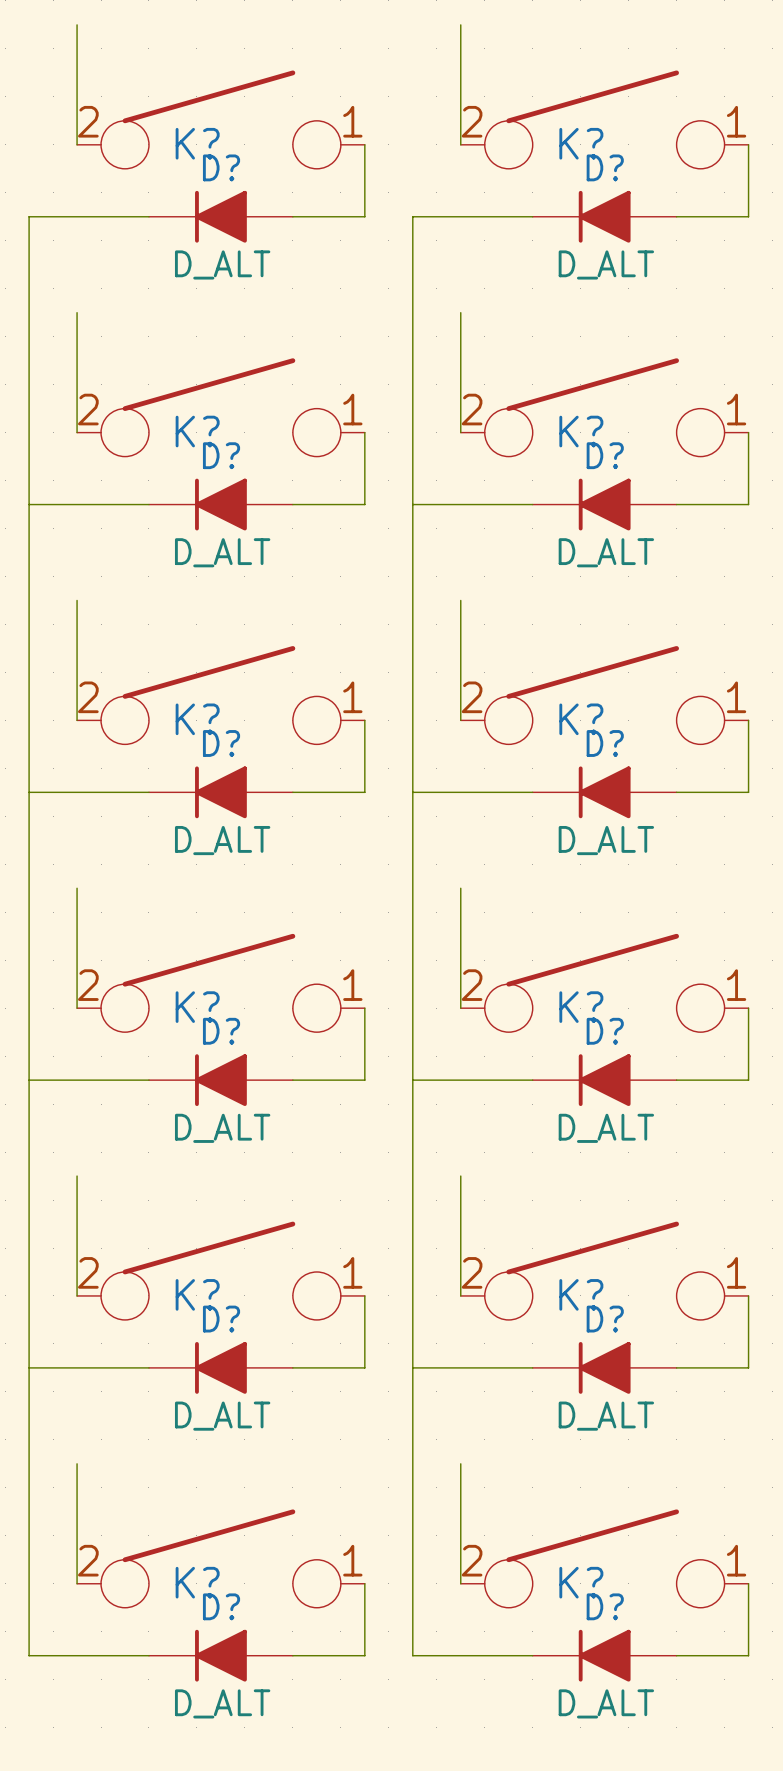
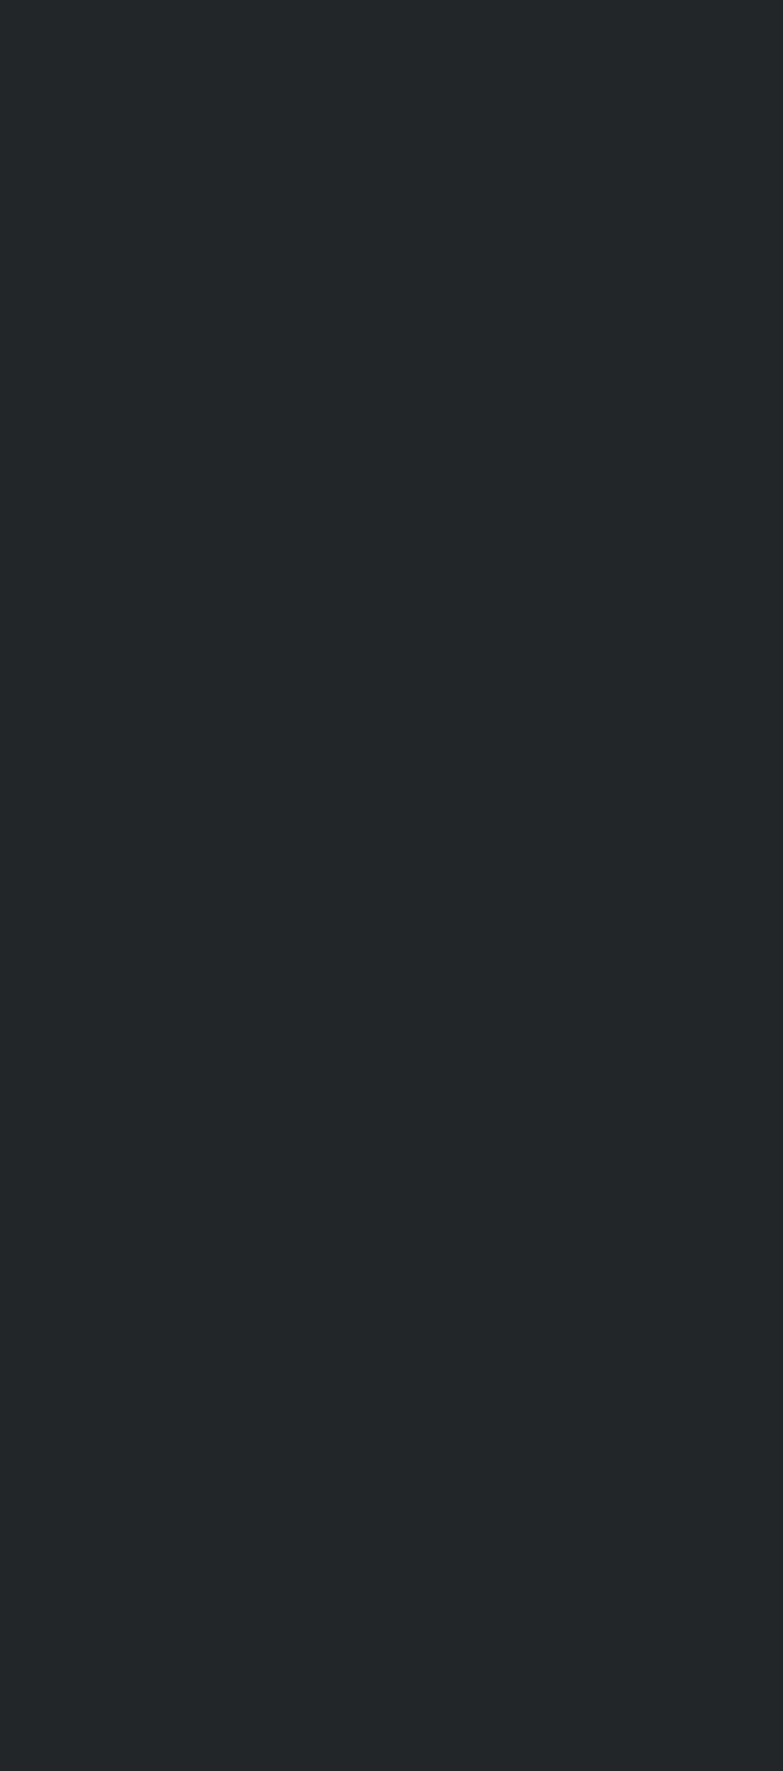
wire: (77, 24) (77, 144) -> none
wire: (460, 24) (460, 144) -> none
K?: (220, 119) -> none
K?: (604, 119) -> none
wire: (364, 144) (364, 216) (292, 216) -> none
wire: (748, 144) (748, 216) (676, 216) -> none
wire: (148, 216) (29, 216) (29, 1655) (148, 1655) -> none
D?: D_ALT (220, 216) -> none
wire: (532, 216) (412, 216) (412, 1655) (532, 1655) -> none
D?: D_ALT (604, 216) -> none
wire: (77, 312) (77, 432) -> none
wire: (460, 312) (460, 432) -> none
K?: (220, 407) -> none
K?: (604, 407) -> none
wire: (364, 432) (364, 504) (292, 504) -> none
wire: (748, 432) (748, 504) (676, 504) -> none
wire: (29, 504) (148, 504) -> none
D?: D_ALT (220, 504) -> none
wire: (412, 504) (532, 504) -> none
D?: D_ALT (604, 504) -> none
wire: (77, 600) (77, 720) -> none
wire: (460, 600) (460, 720) -> none
K?: (220, 695) -> none
K?: (604, 695) -> none
wire: (364, 720) (364, 792) (292, 792) -> none
wire: (748, 720) (748, 792) (676, 792) -> none
wire: (29, 792) (148, 792) -> none
D?: D_ALT (220, 792) -> none
wire: (412, 792) (532, 792) -> none
D?: D_ALT (604, 792) -> none
wire: (77, 888) (77, 1008) -> none
wire: (460, 888) (460, 1008) -> none
K?: (220, 983) -> none
K?: (604, 983) -> none
wire: (364, 1008) (364, 1080) (292, 1080) -> none
wire: (748, 1008) (748, 1080) (676, 1080) -> none
wire: (29, 1080) (148, 1080) -> none
D?: D_ALT (220, 1080) -> none
wire: (412, 1080) (532, 1080) -> none
D?: D_ALT (604, 1080) -> none
wire: (77, 1176) (77, 1295) -> none
wire: (460, 1176) (460, 1295) -> none
K?: (220, 1270) -> none
K?: (604, 1270) -> none
wire: (364, 1295) (364, 1367) (292, 1367) -> none
wire: (748, 1295) (748, 1367) (676, 1367) -> none
wire: (29, 1367) (148, 1367) -> none
D?: D_ALT (220, 1367) -> none
wire: (412, 1367) (532, 1367) -> none
D?: D_ALT (604, 1367) -> none
wire: (77, 1463) (77, 1583) -> none
wire: (460, 1463) (460, 1583) -> none
K?: (220, 1558) -> none
K?: (604, 1558) -> none
wire: (364, 1583) (364, 1655) (292, 1655) -> none
wire: (748, 1583) (748, 1655) (676, 1655) -> none
D?: D_ALT (220, 1655) -> none
D?: D_ALT (604, 1655) -> none

